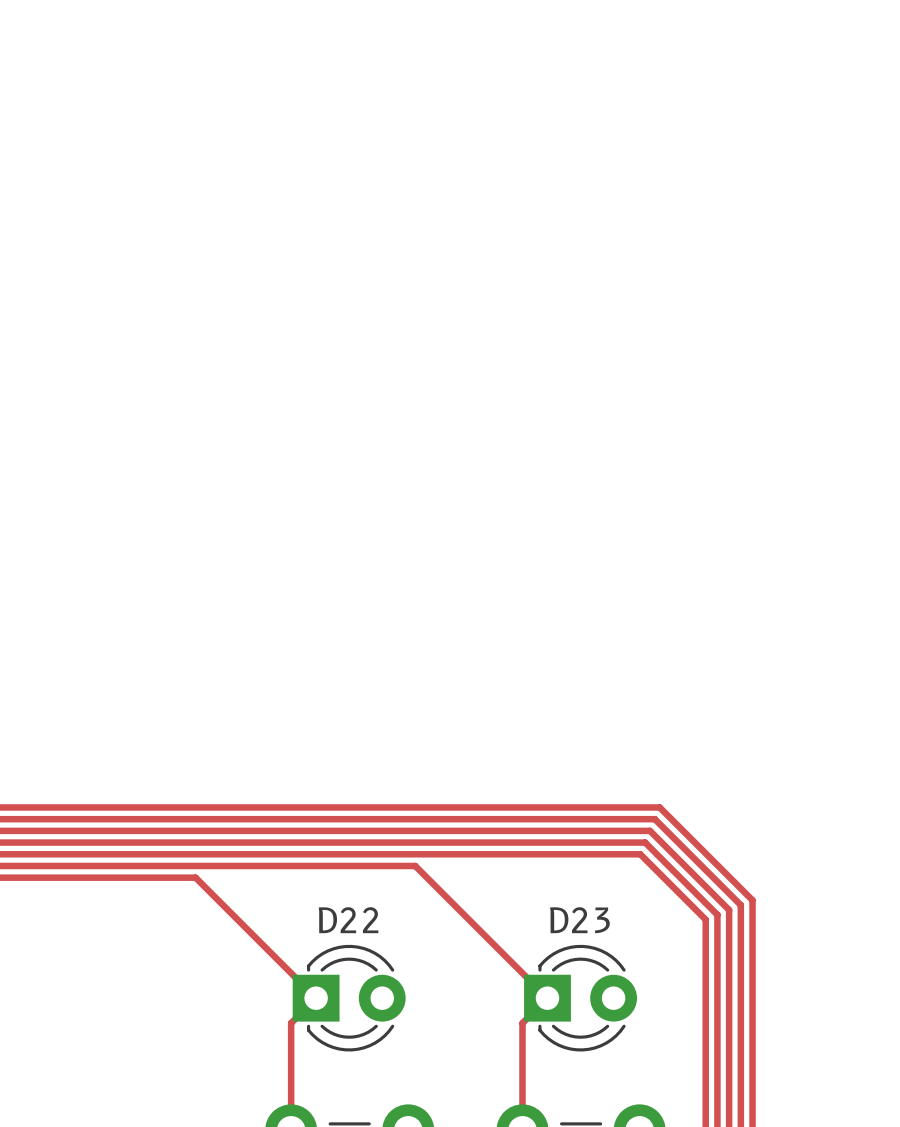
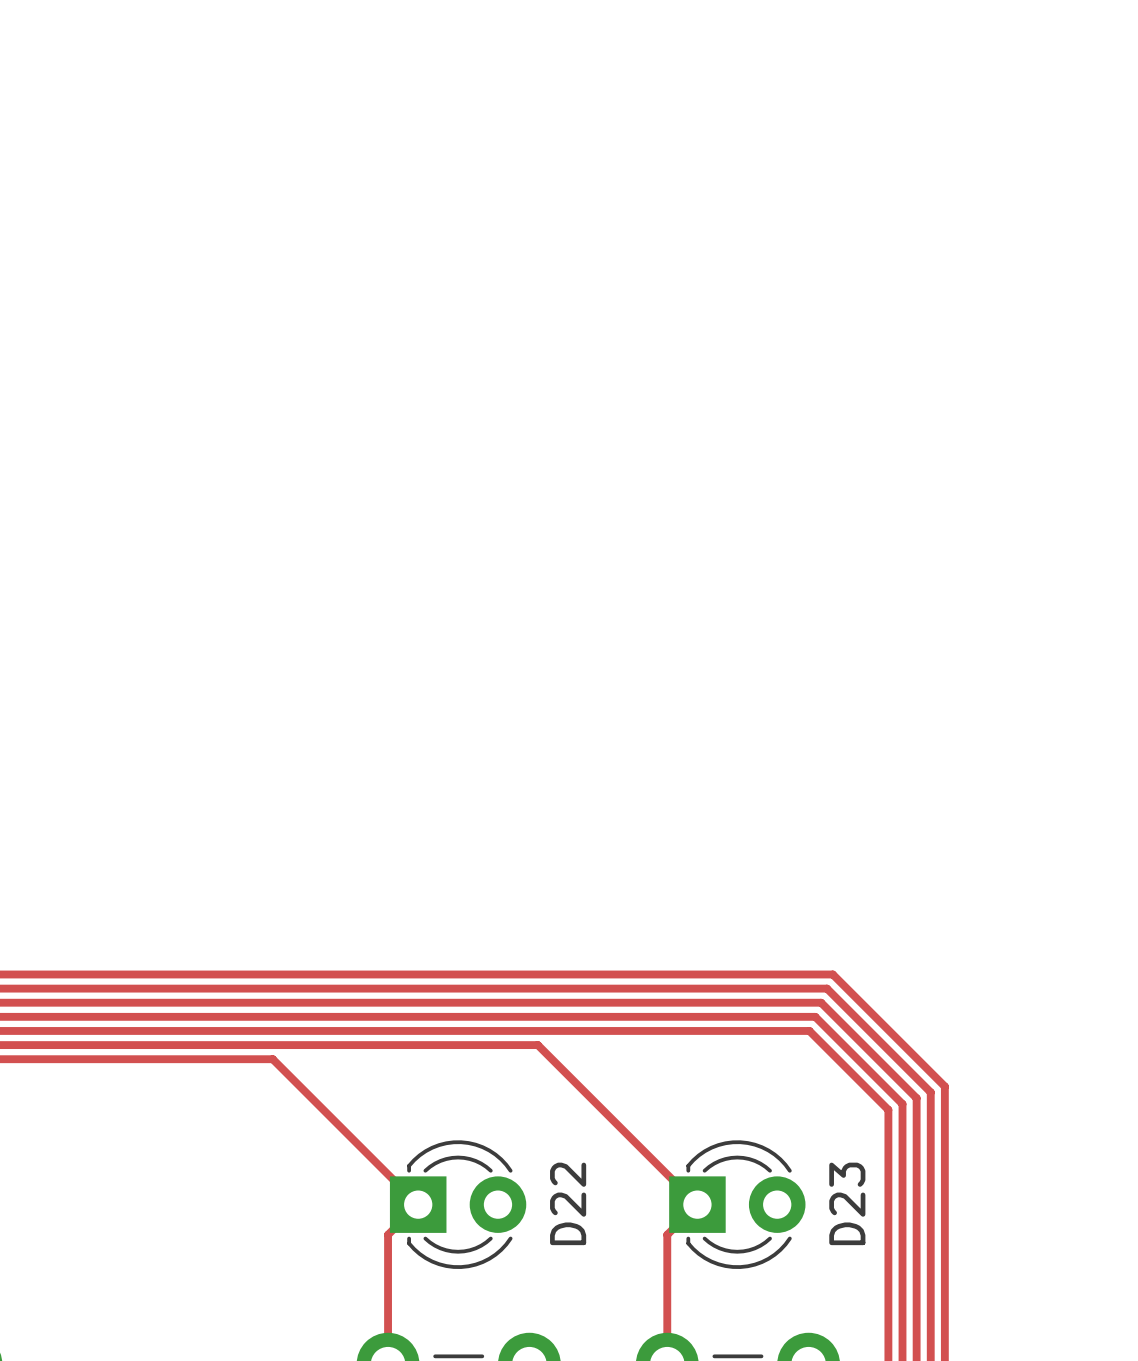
D22 name rotation: 0° (348, 920) -> 90° counterclockwise (568, 1203)
D22 name position: D22 (348, 920) -> D22 (568, 1203)
D23 name rotation: 0° (579, 920) -> 90° counterclockwise (847, 1203)
D23 name position: D23 (579, 920) -> D23 (847, 1203)

